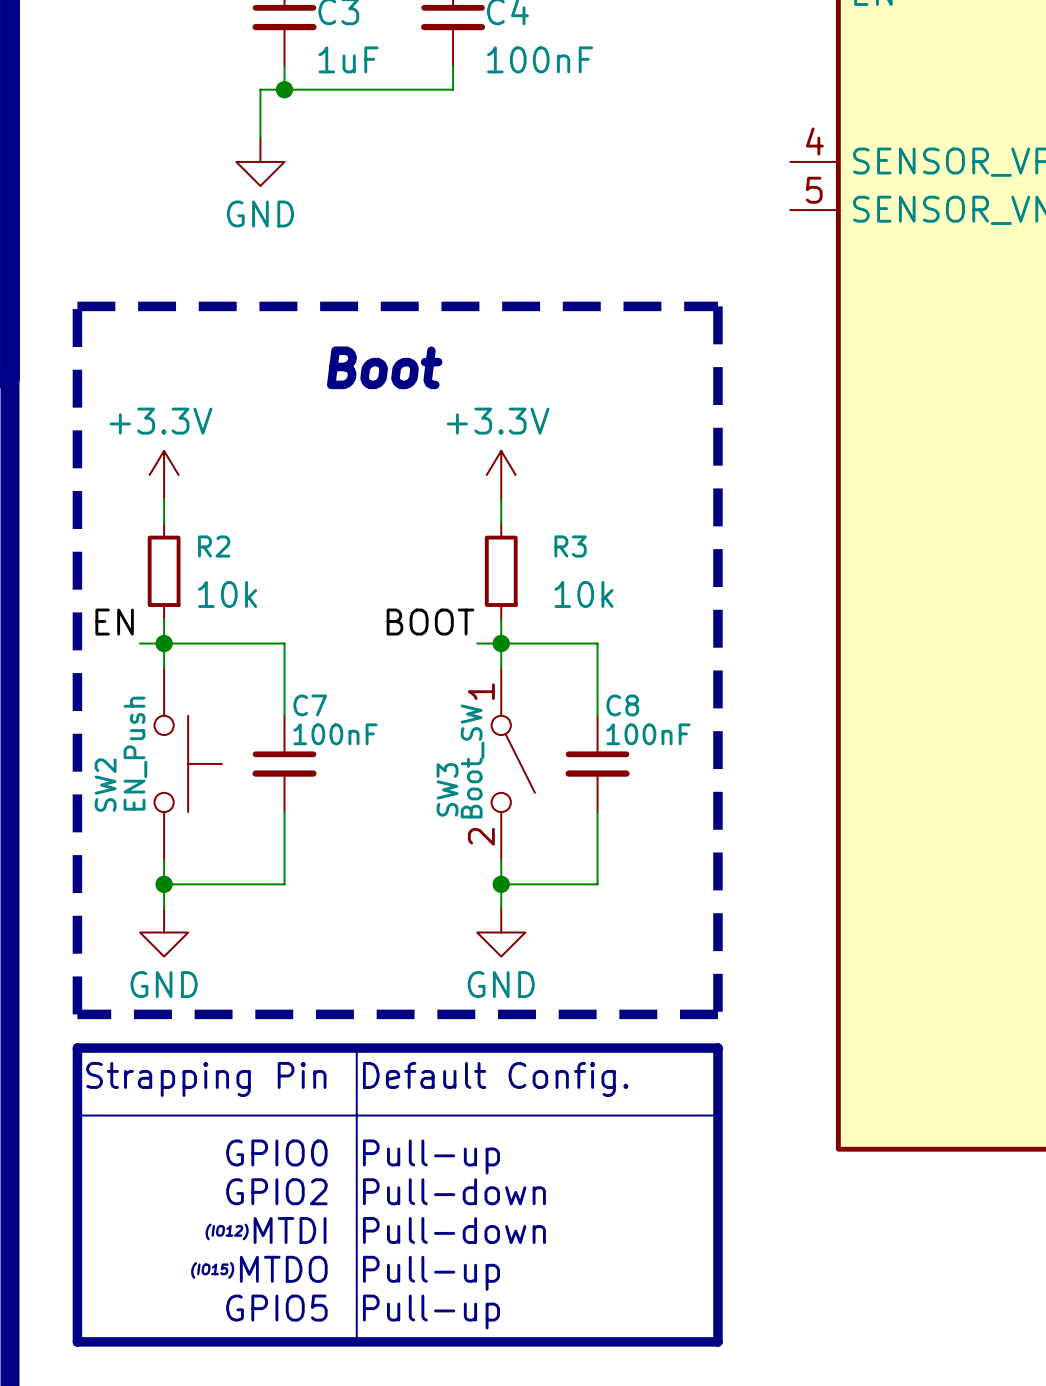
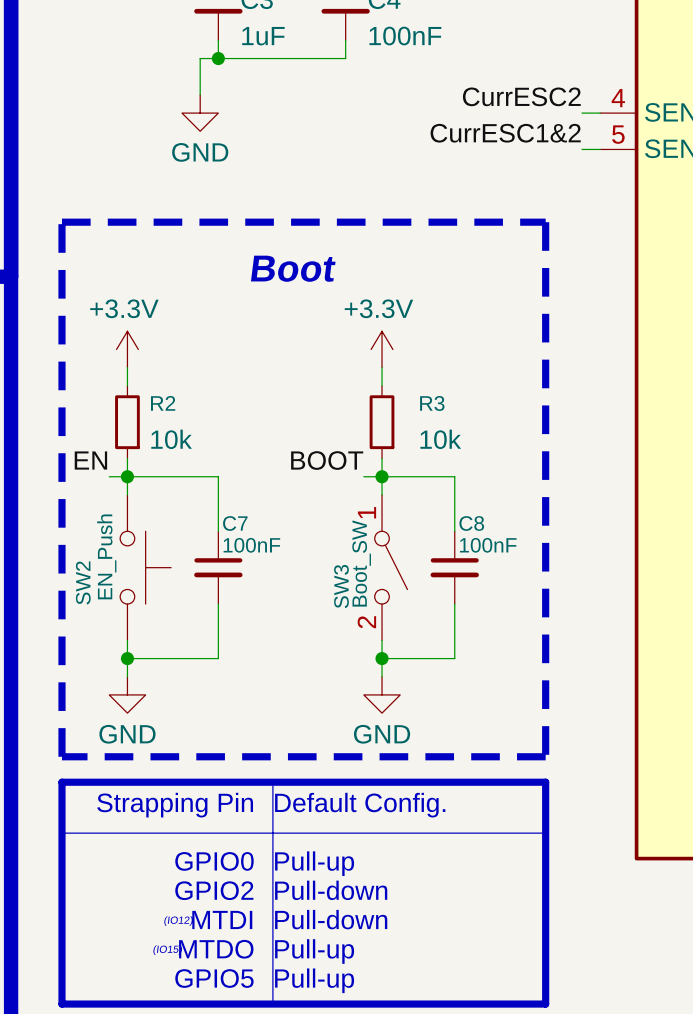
label: none -> CurrESC2 (521, 96)
wire: none -> (582, 113) (600, 113)
label: none -> CurrESC1&2 (505, 133)
wire: none -> (582, 149) (600, 149)

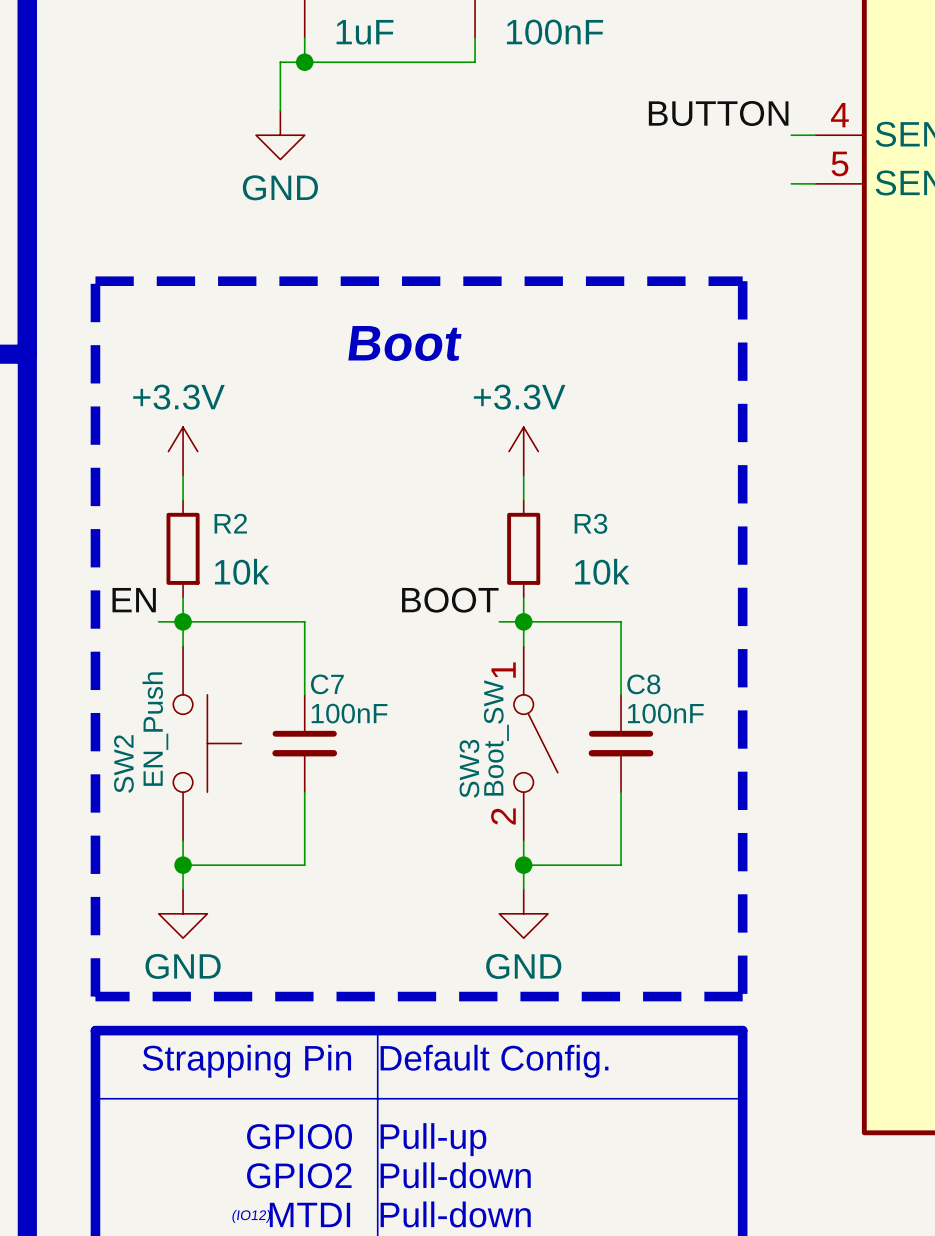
label: CurrESC2 (521, 96) -> BUTTON (718, 113)
label: CurrESC1&2 (505, 133) -> none

